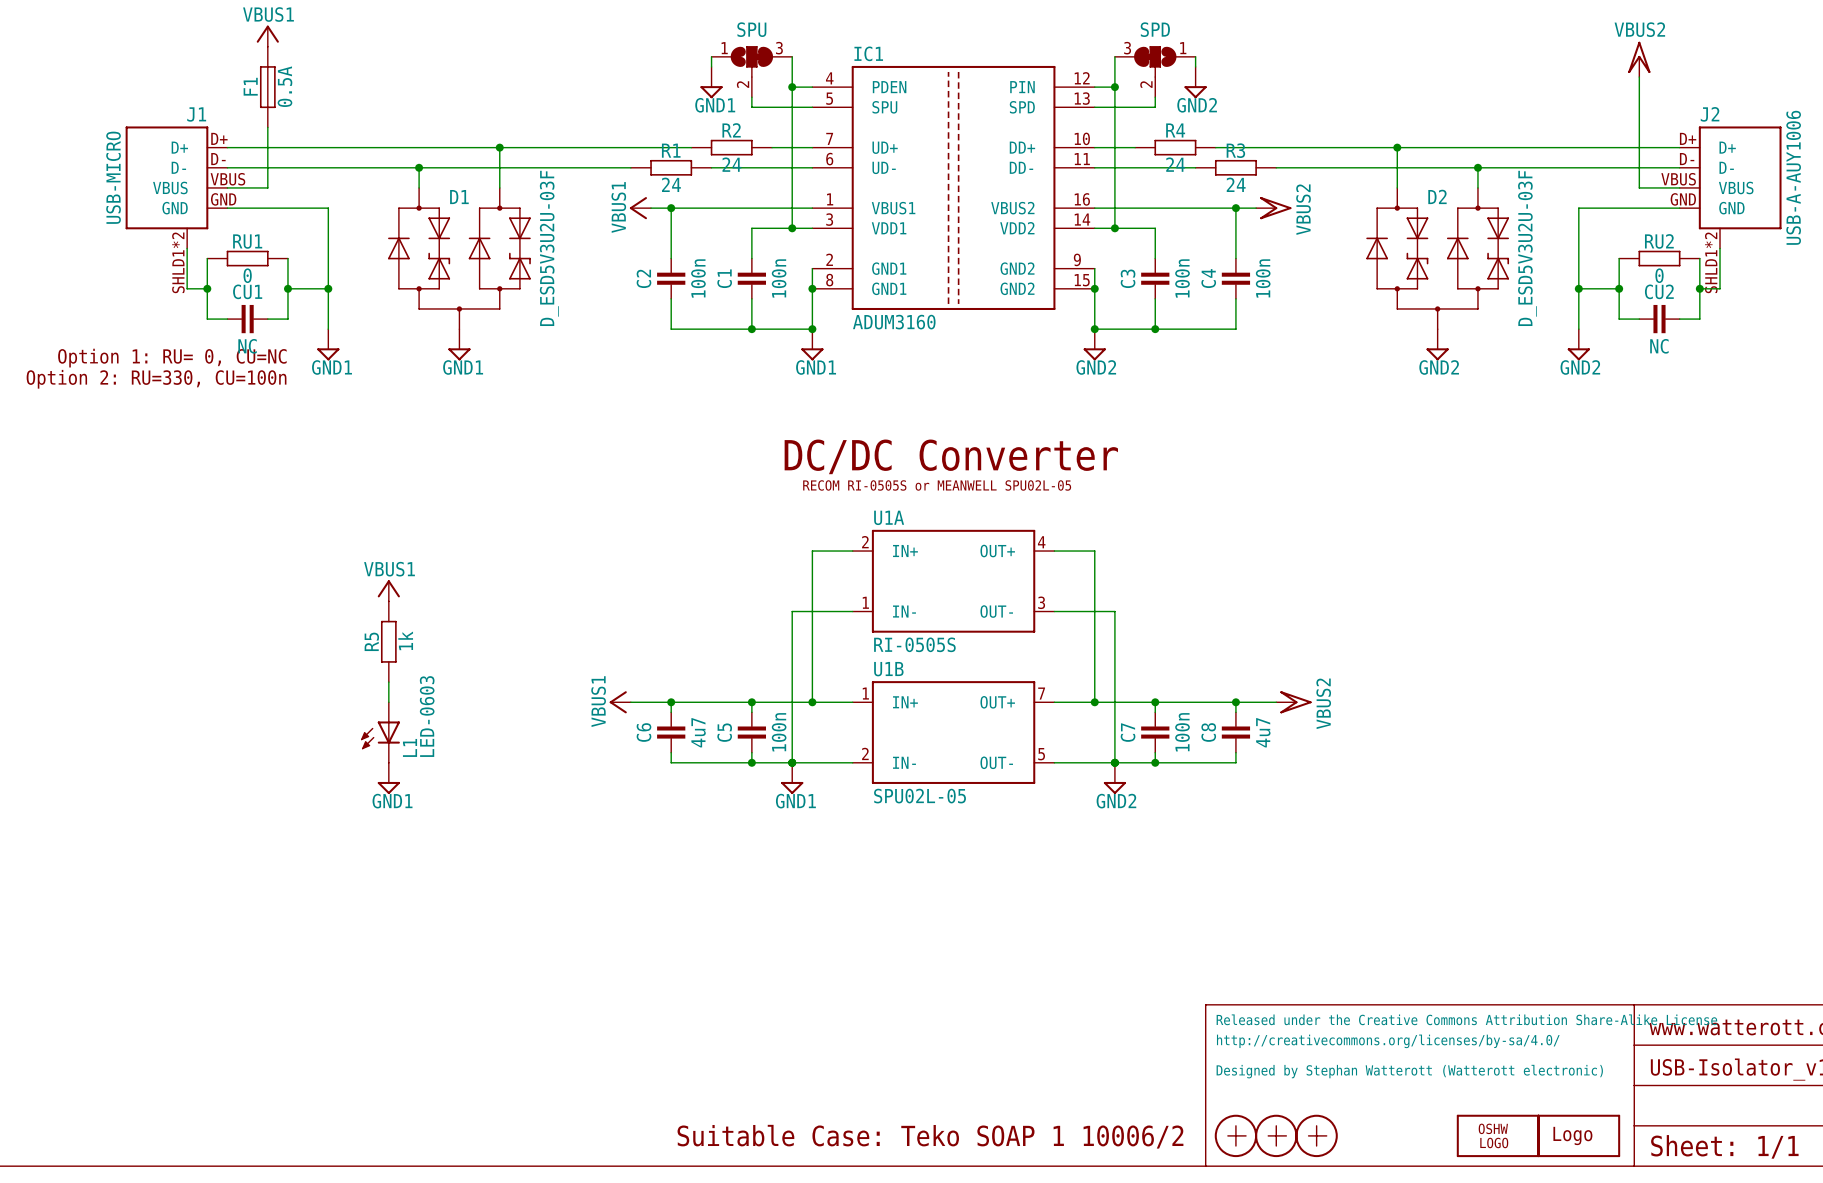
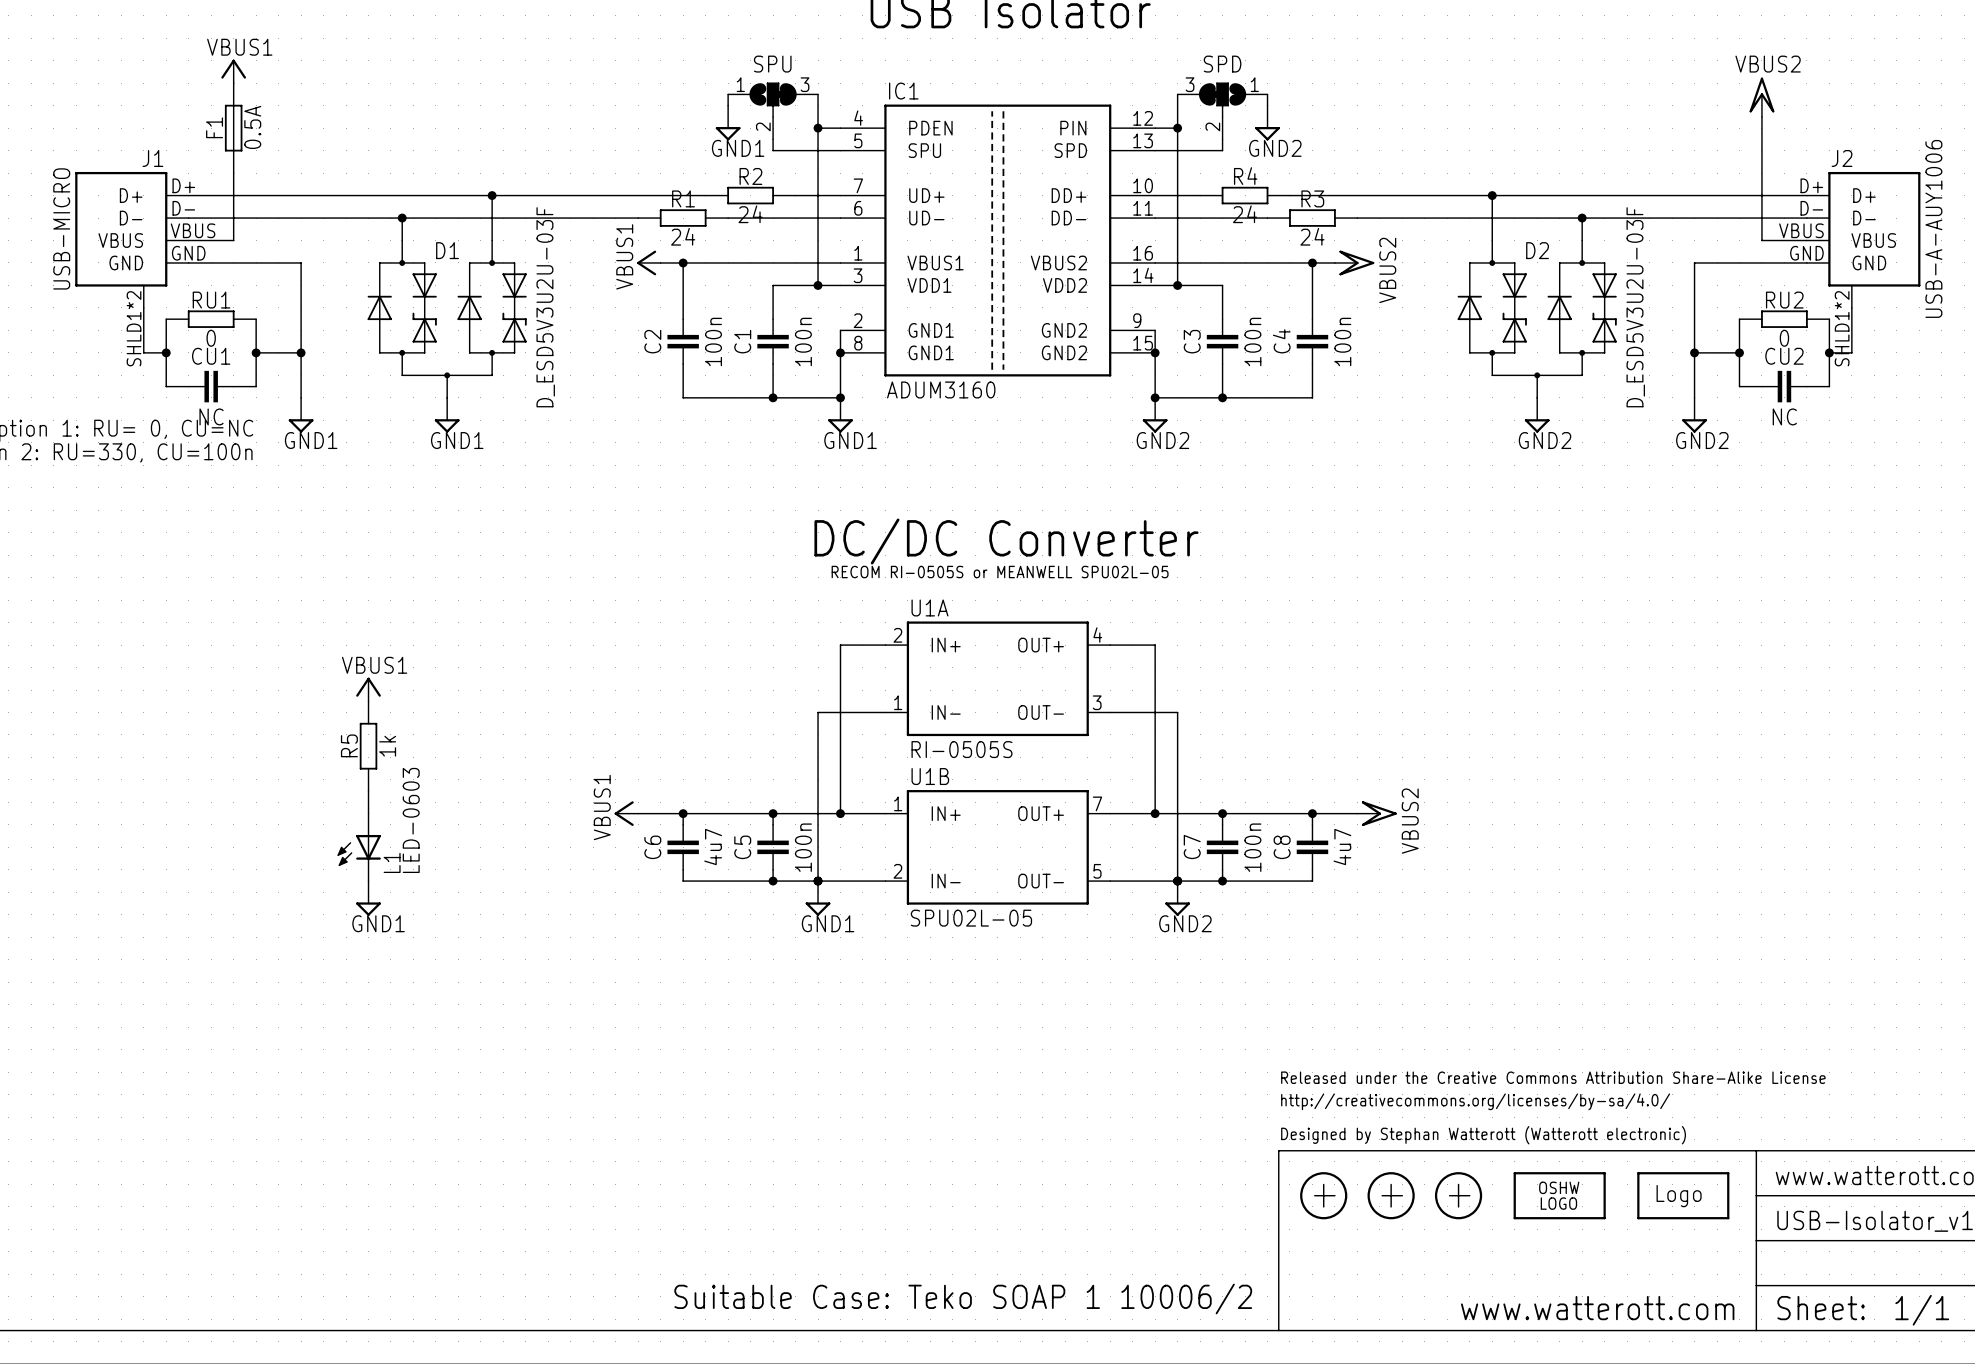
text position: Released under the Creative Commons Attribution Share-Alike License (1466, 1019) -> Released under the Creative Commons Attribution Share-Alike License (1553, 1077)
text position: http://creativecommons.org/licenses/by-sa/4.0/ (1388, 1041) -> http://creativecommons.org/licenses/by-sa/4.0/ (1475, 1101)
part: none -> (1323, 1195)
part: none -> (1391, 1195)
part: none -> (1458, 1195)
text position: Designed by Stephan Watterott (Watterott electronic) (1409, 1071) -> Designed by Stephan Watterott (Watterott electronic) (1483, 1135)
part: (1235, 1135) -> none
part: (1276, 1135) -> none
part: (1316, 1135) -> none
part position: (1498, 1135) -> (1559, 1195)
part position: (1578, 1135) -> (1683, 1195)
text: none -> www.watterott.com (1597, 1308)

